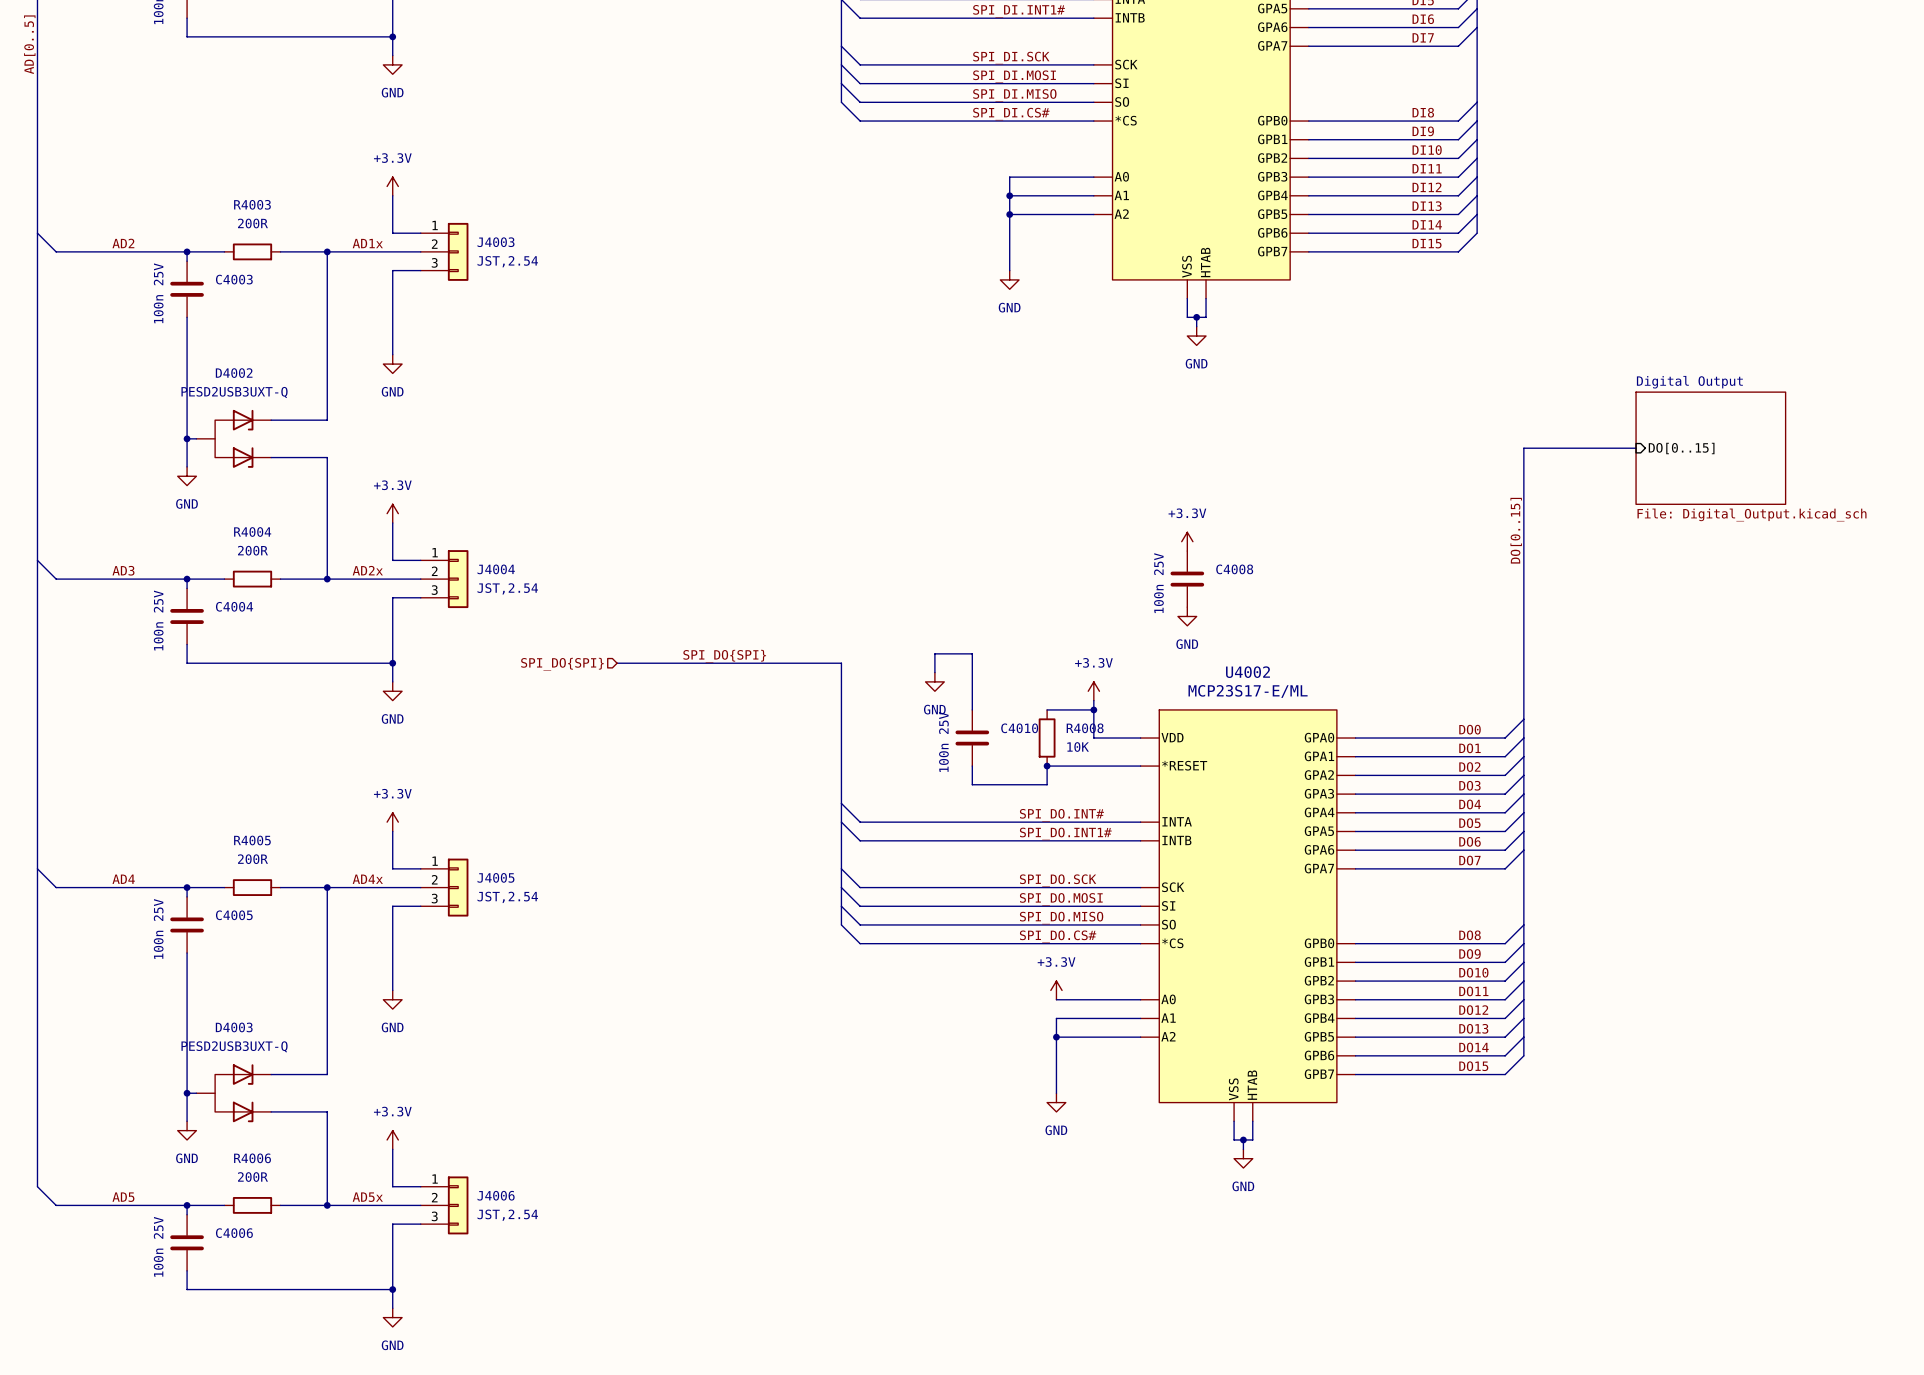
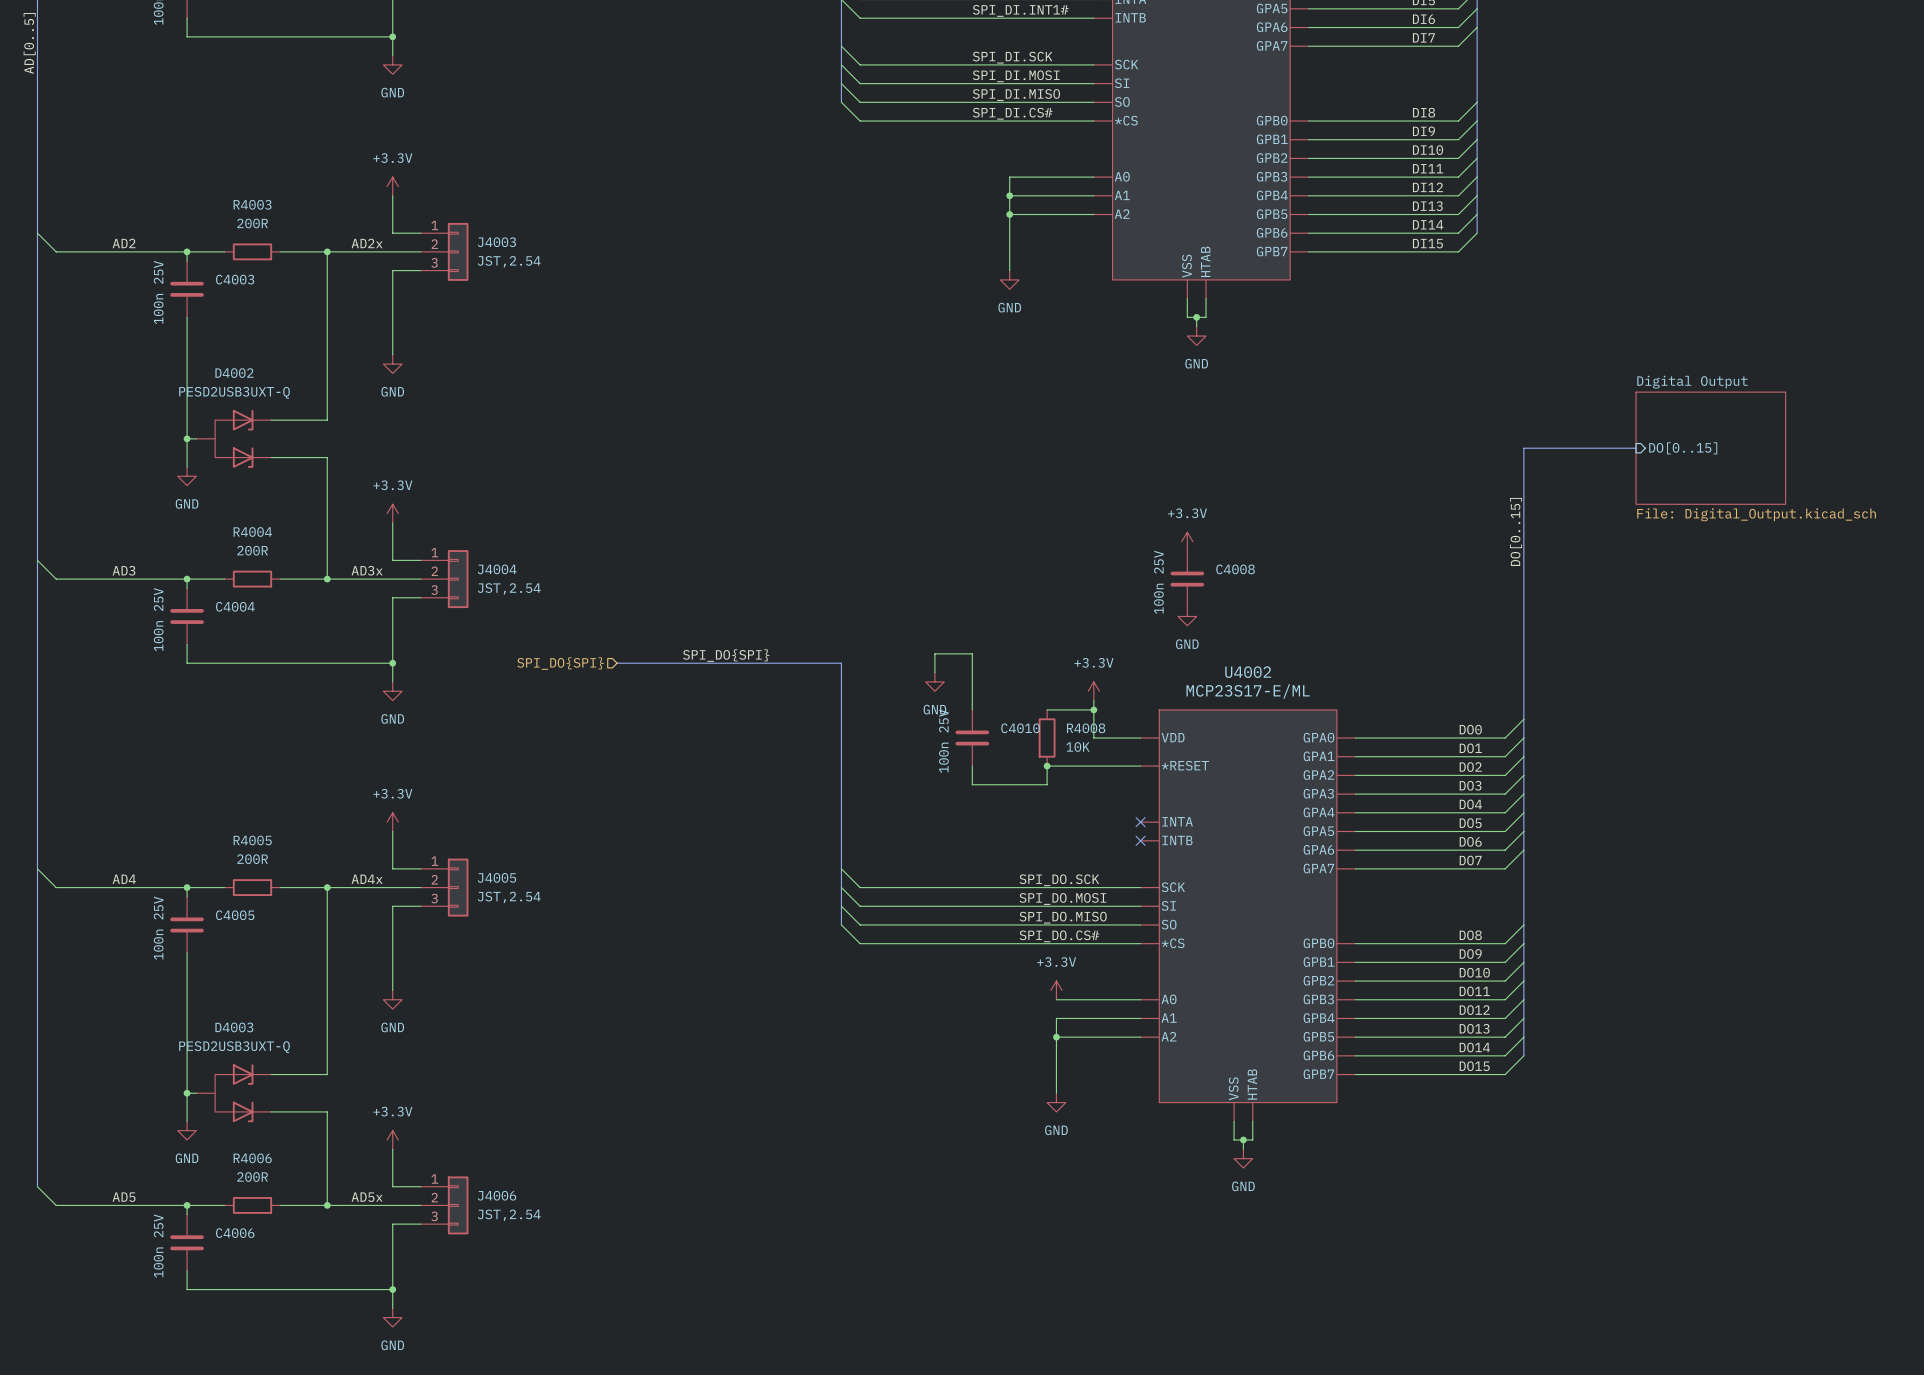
label: AD1x (367, 243) -> AD2x (367, 243)
label: AD2x (367, 570) -> AD3x (367, 570)
wire: (841, 803) (860, 822) (1140, 822) -> none
label: SPI_DO.INT# (1061, 815) -> none
wire: (841, 822) (860, 840) (1140, 840) -> none
no-connect mark: none -> (1140, 822)
label: SPI_DO.INT1# (1065, 833) -> none
no-connect mark: none -> (1140, 840)

